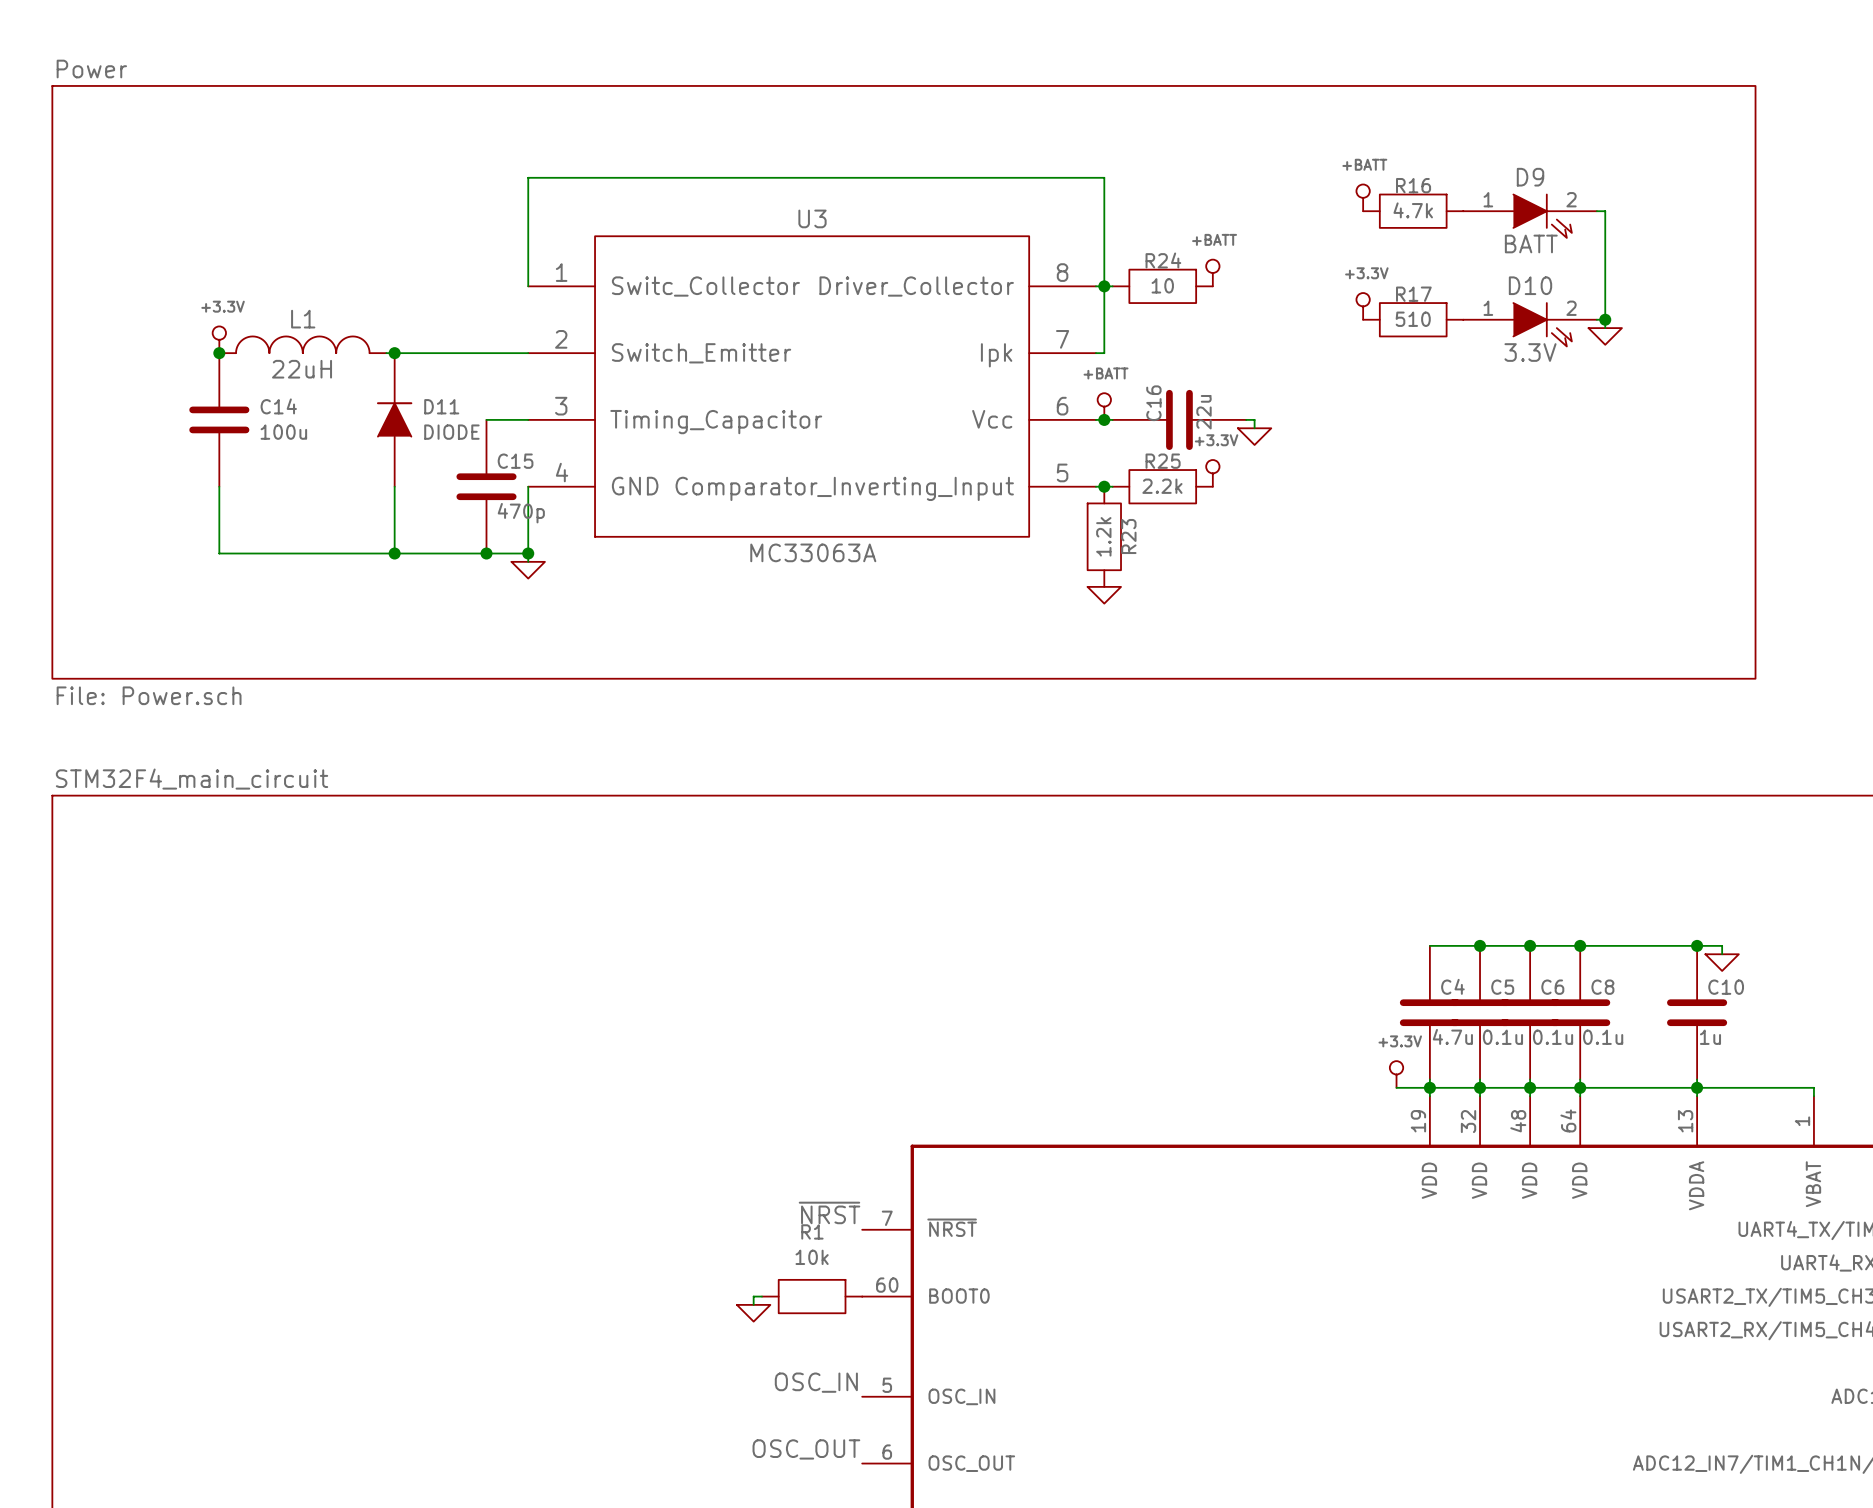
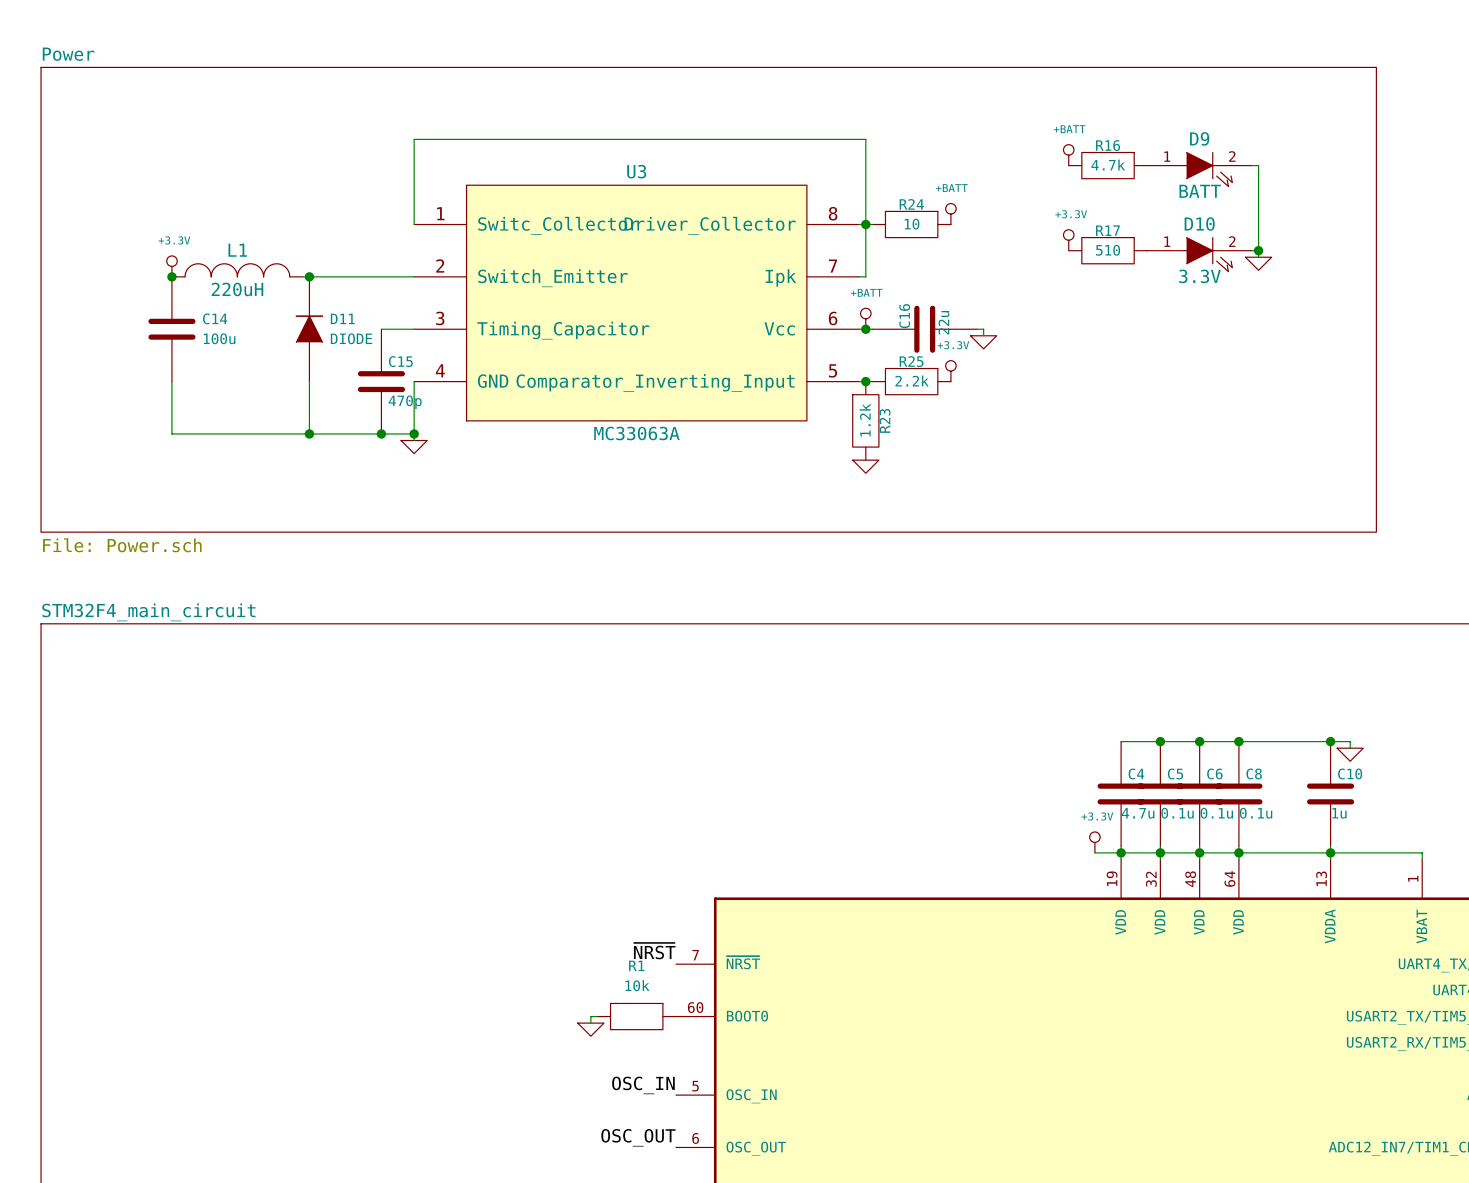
L1 value: 22uH (302, 369) -> 220uH (237, 289)

